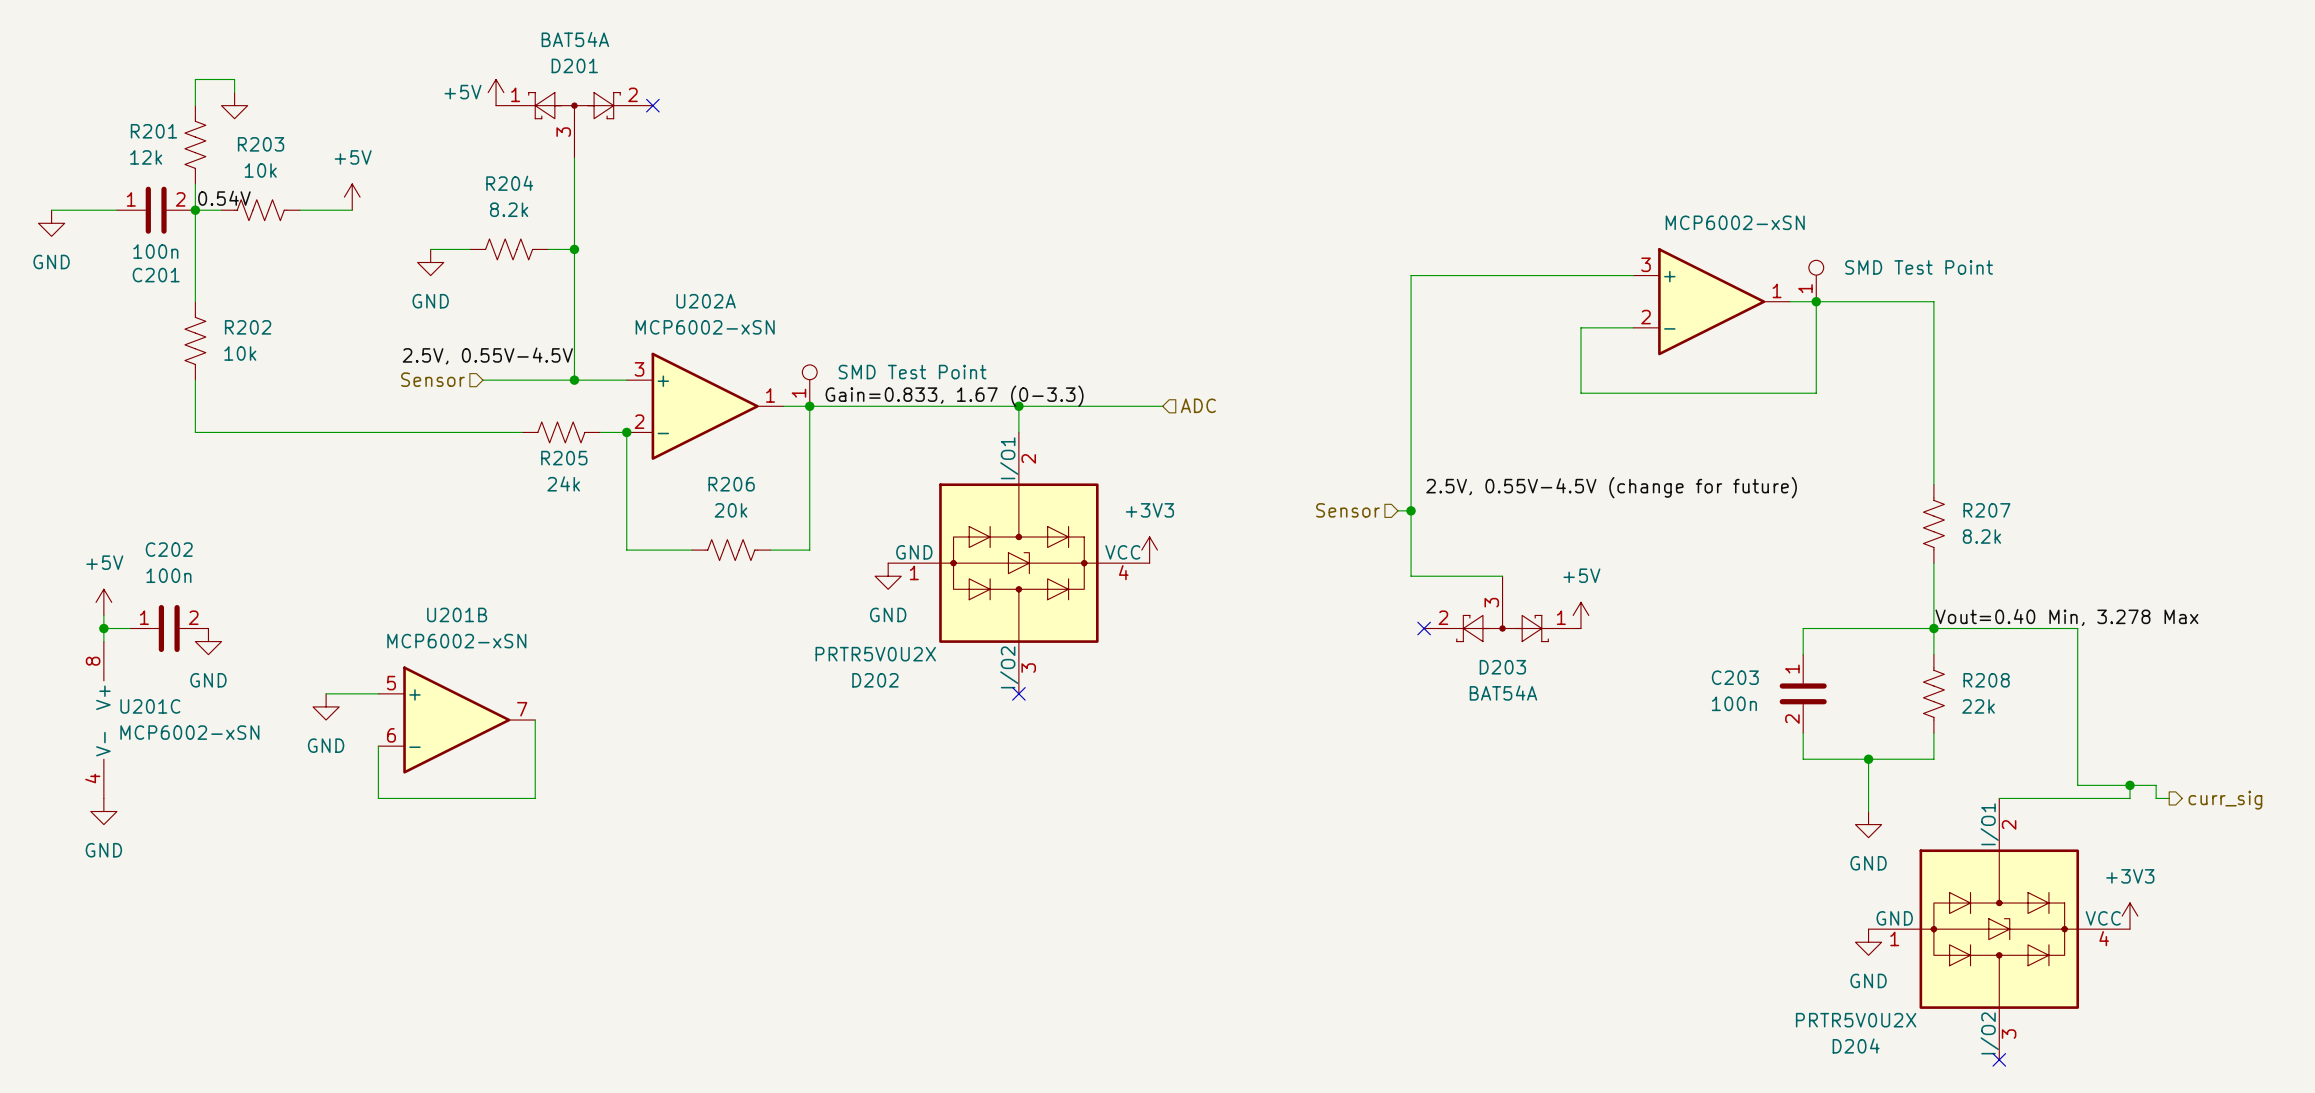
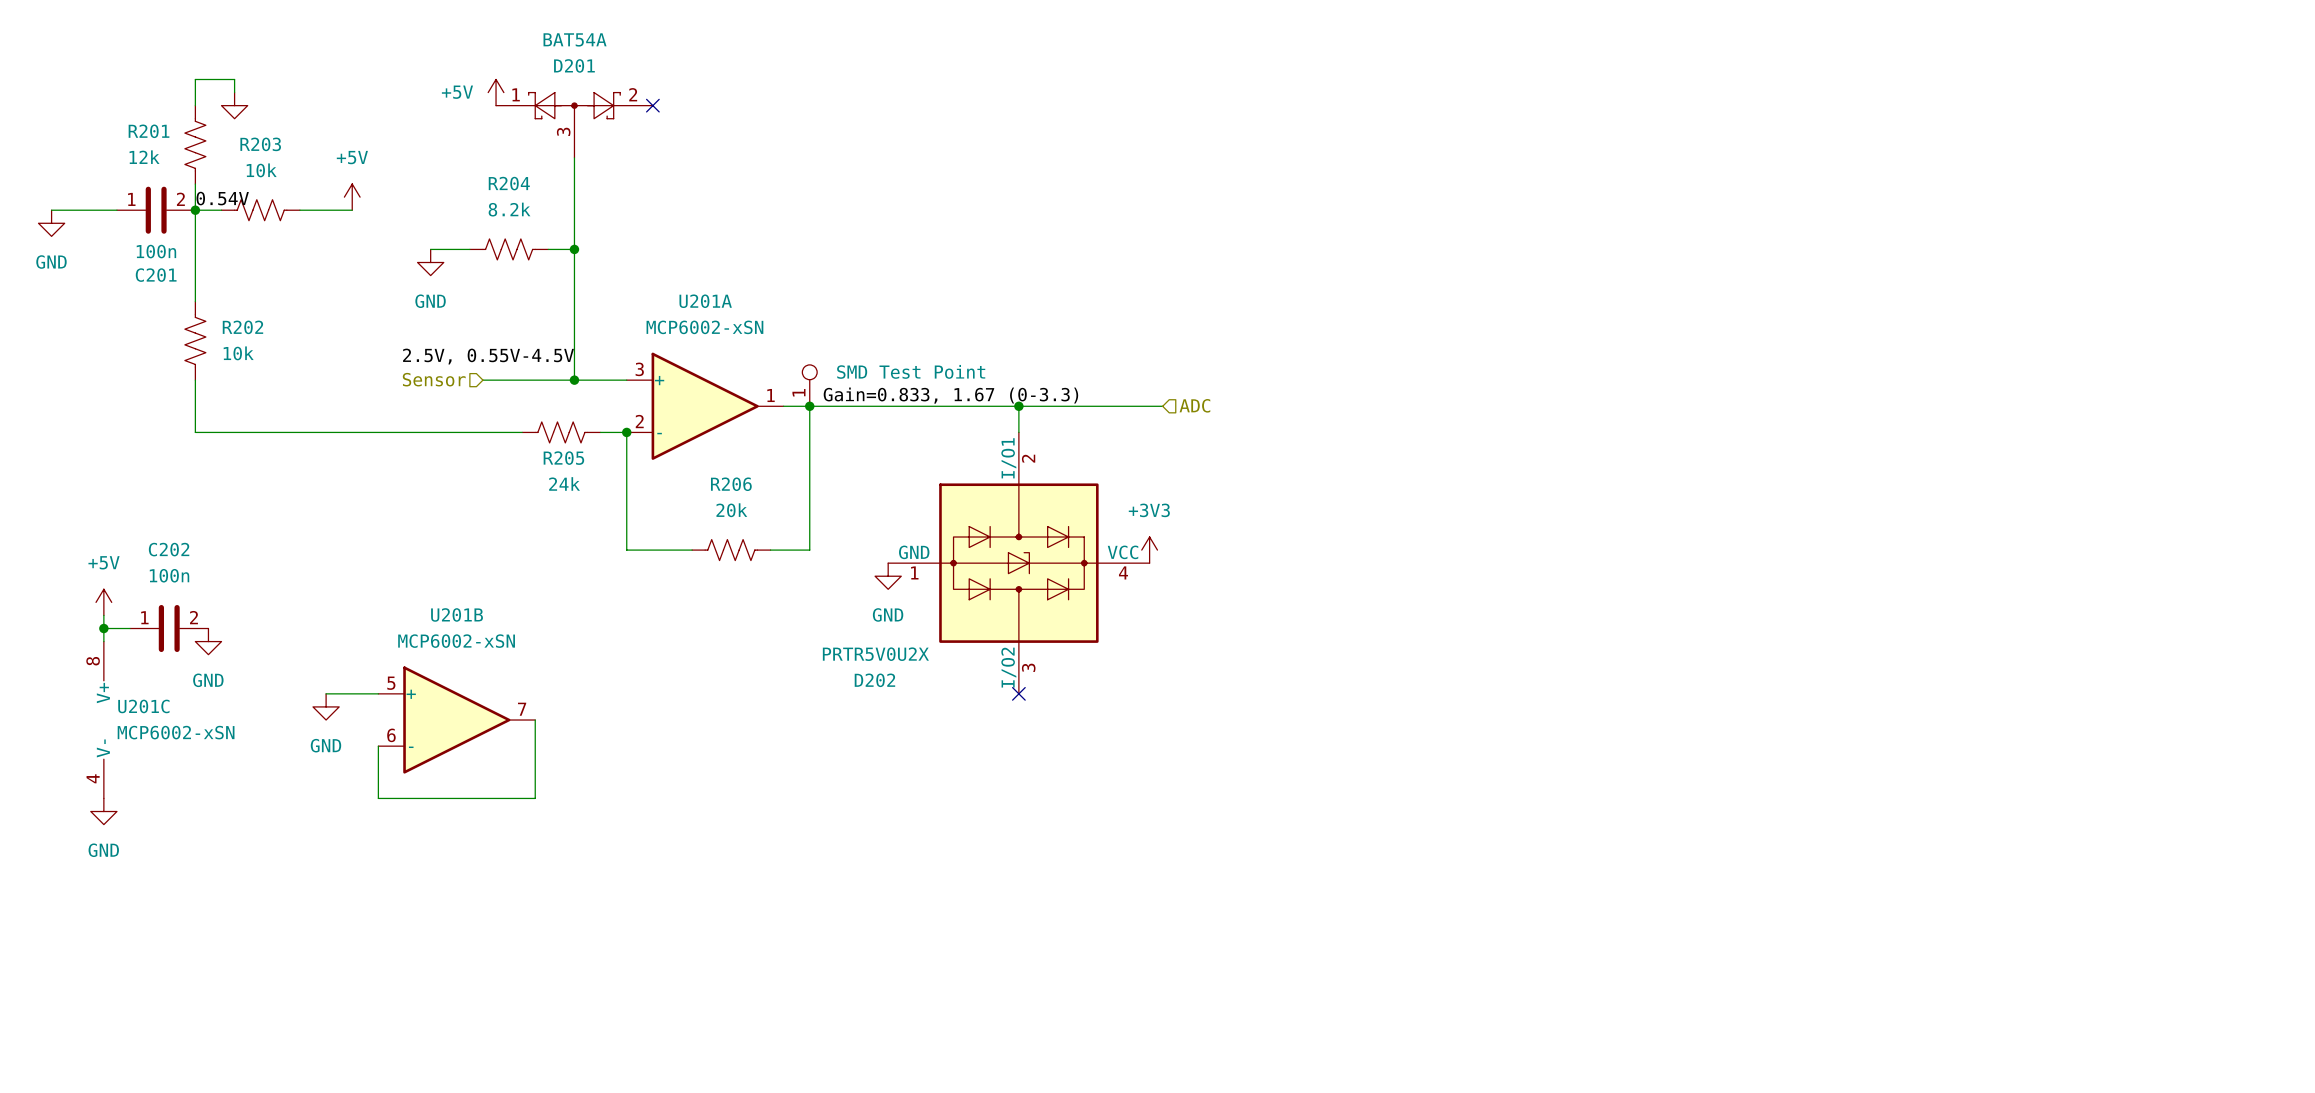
wire: (1633, 275) (1411, 275) (1411, 576) (1502, 576) -> none
part: SMD Test Point (1816, 281) -> none
U202A name: U202A (706, 301) -> U201A (705, 301)
part: MCP6002-xSN (1711, 301) -> none
wire: (1790, 301) (1933, 301) (1933, 484) -> none
wire: (1816, 301) (1816, 393) (1580, 393) (1580, 327) (1633, 327) -> none
junction: (1816, 301) -> none
label: 2.5V, 0.55V-4.5V (change for future) (1611, 487) -> none
hierarchical label: Sensor (1347, 510) -> none
wire: (1397, 510) (1411, 510) -> none
junction: (1411, 510) -> none
R207: 8.2k (1933, 523) -> none
wire: (1933, 563) (1933, 654) -> none
D203: BAT54A (1502, 608) -> none
power symbol: +5V (1580, 615) -> none
label: Vout=0.40 Min, 3.278 Max (2066, 617) -> none
no-connect mark: (1424, 628) -> none
junction: (1933, 628) -> none
wire: (1803, 654) (1803, 628) (2077, 628) (2077, 785) (2156, 785) (2156, 798) (2169, 798) -> none
C203: 100n (1803, 693) -> none
R208: 22k (1933, 693) -> none
wire: (1803, 733) (1803, 759) (1933, 759) (1933, 733) -> none
wire: (1868, 759) (1868, 811) -> none
junction: (1868, 759) -> none
wire: (2129, 785) (2129, 798) (1999, 798) -> none
junction: (2129, 785) -> none
hierarchical label: curr_sig (2225, 800) -> none
power symbol: GND (1868, 824) -> none
power symbol: +3V3 (2129, 916) -> none
D204: PRTR5V0U2X (1999, 929) -> none
power symbol: GND (1868, 942) -> none
no-connect mark: (1999, 1059) -> none

